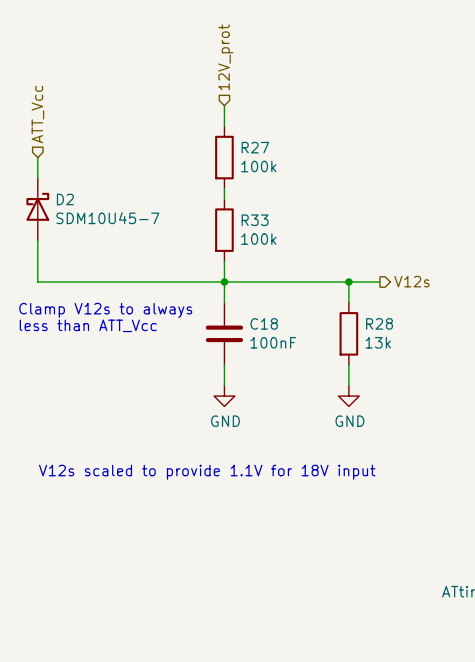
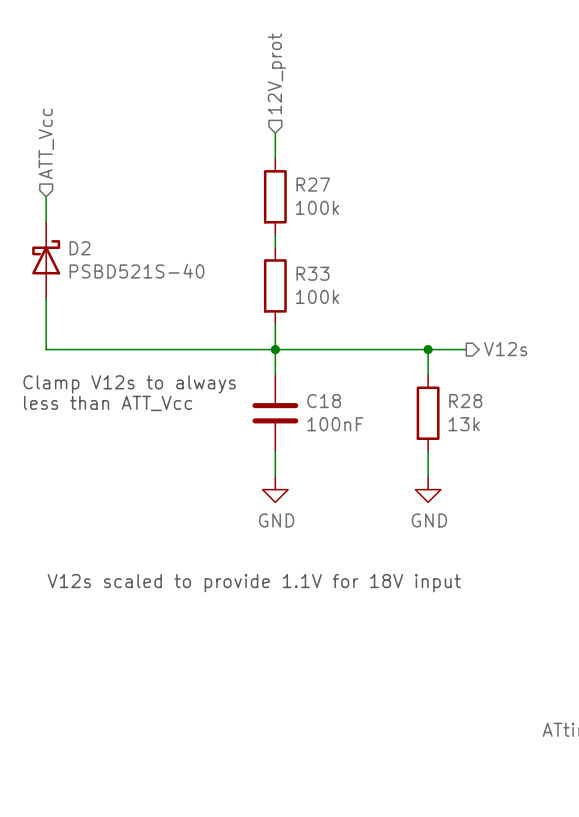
D2 value: SDM10U45-7 (107, 218) -> PSBD521S-40 (137, 271)

